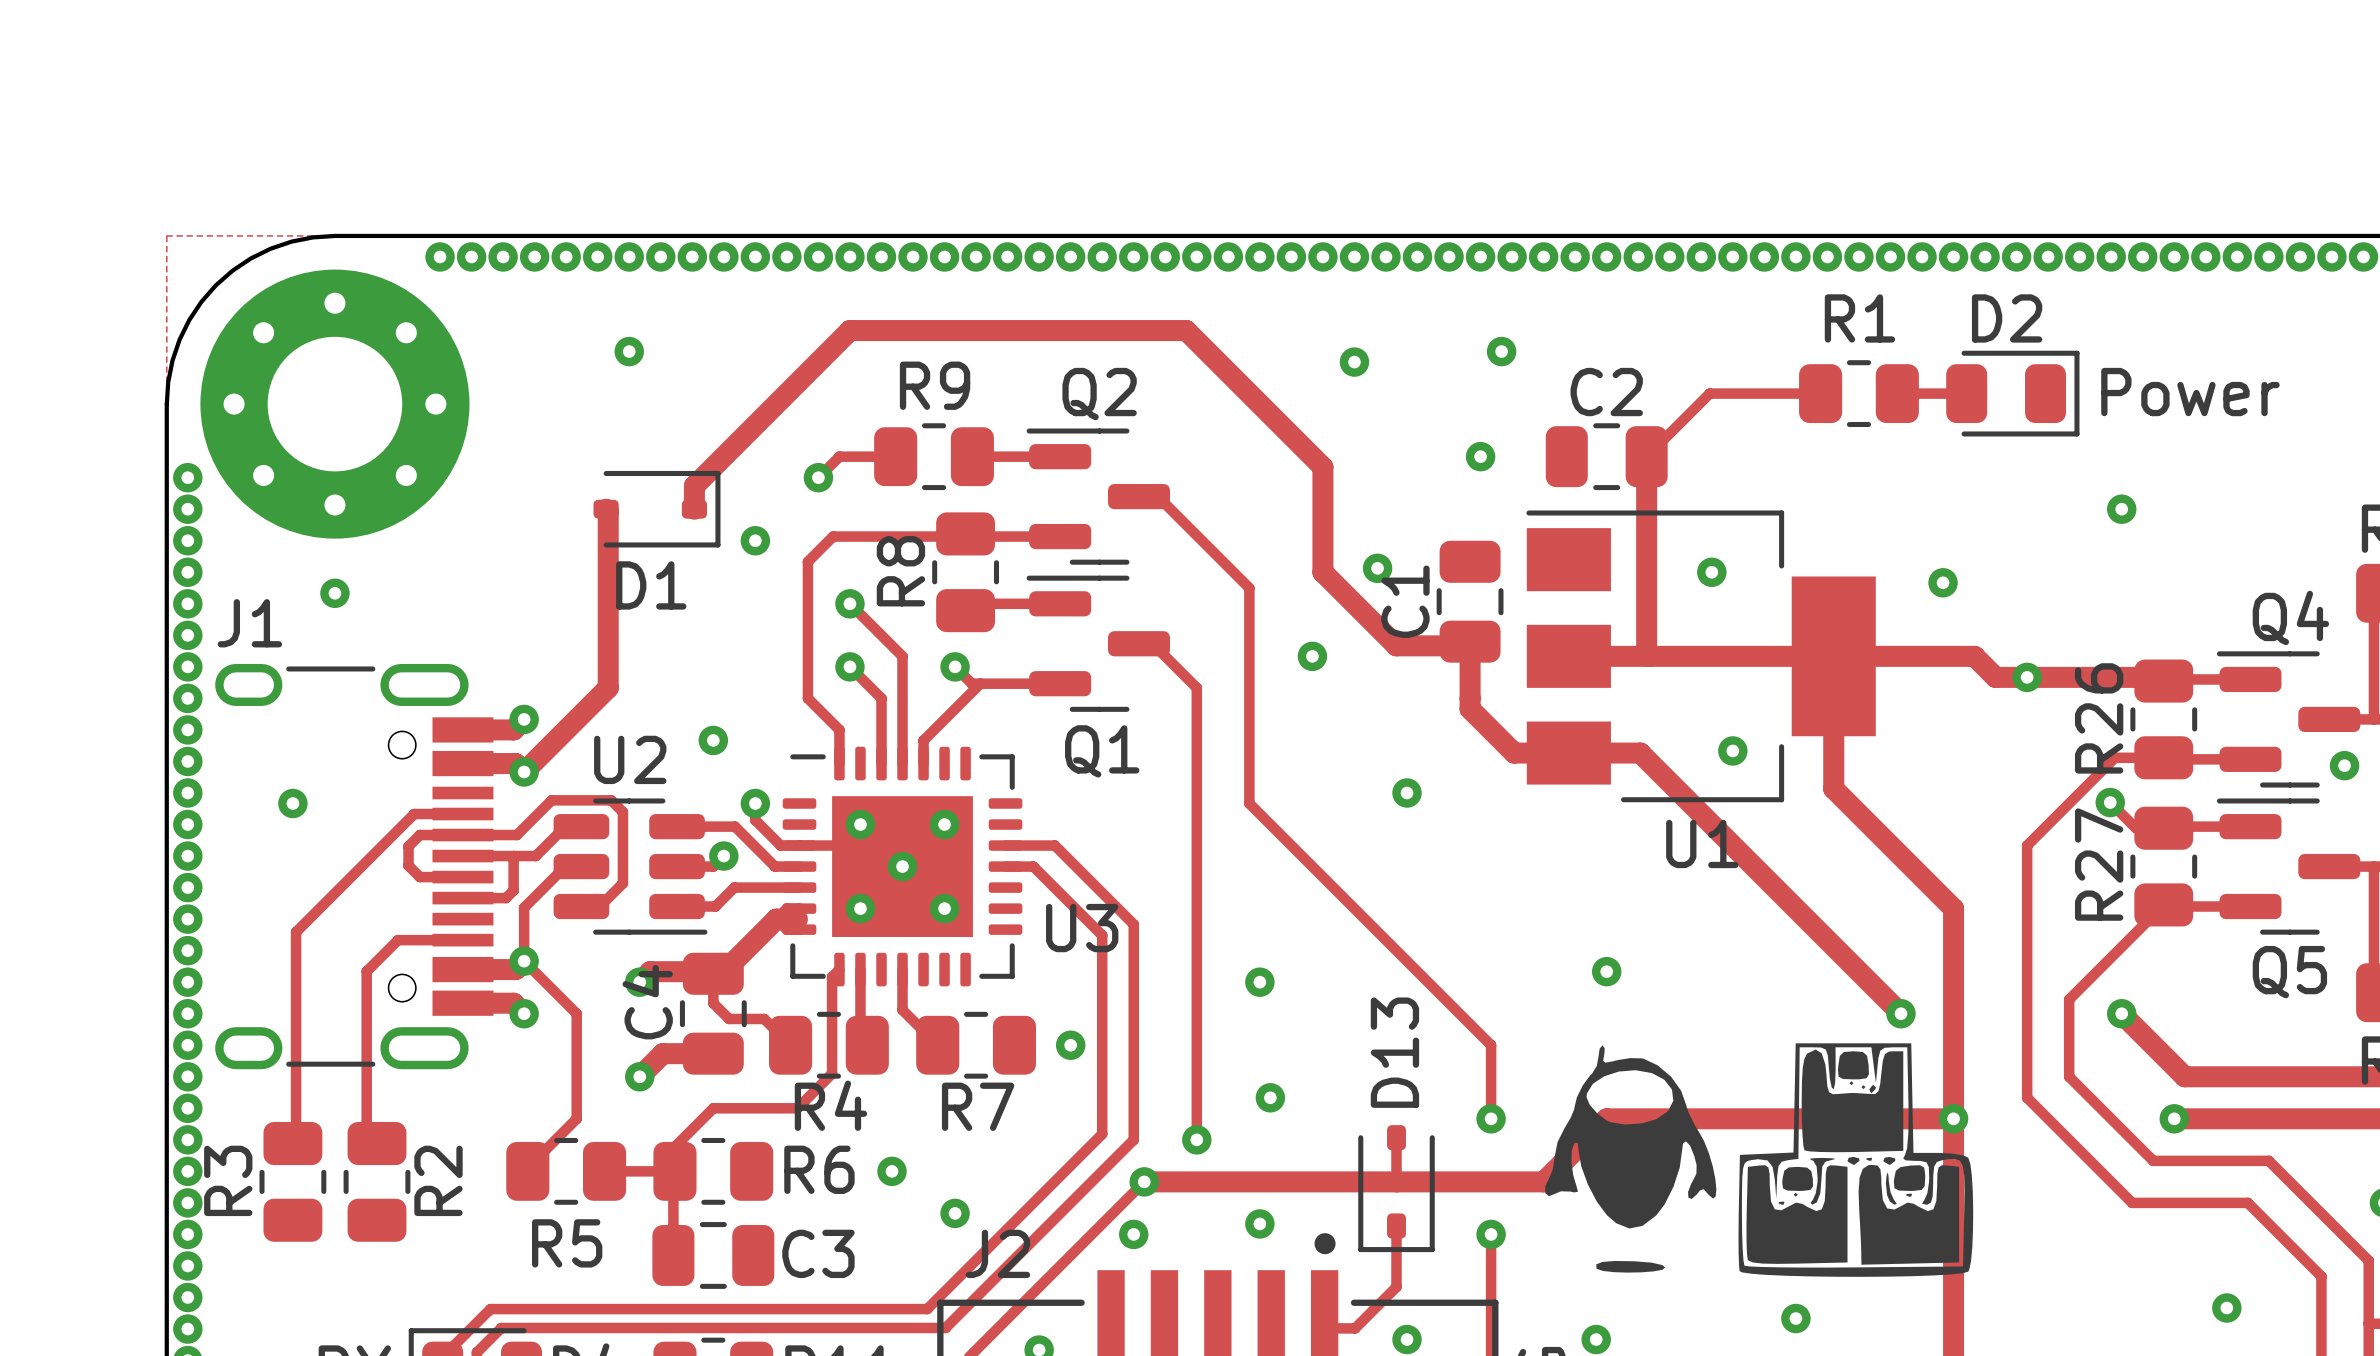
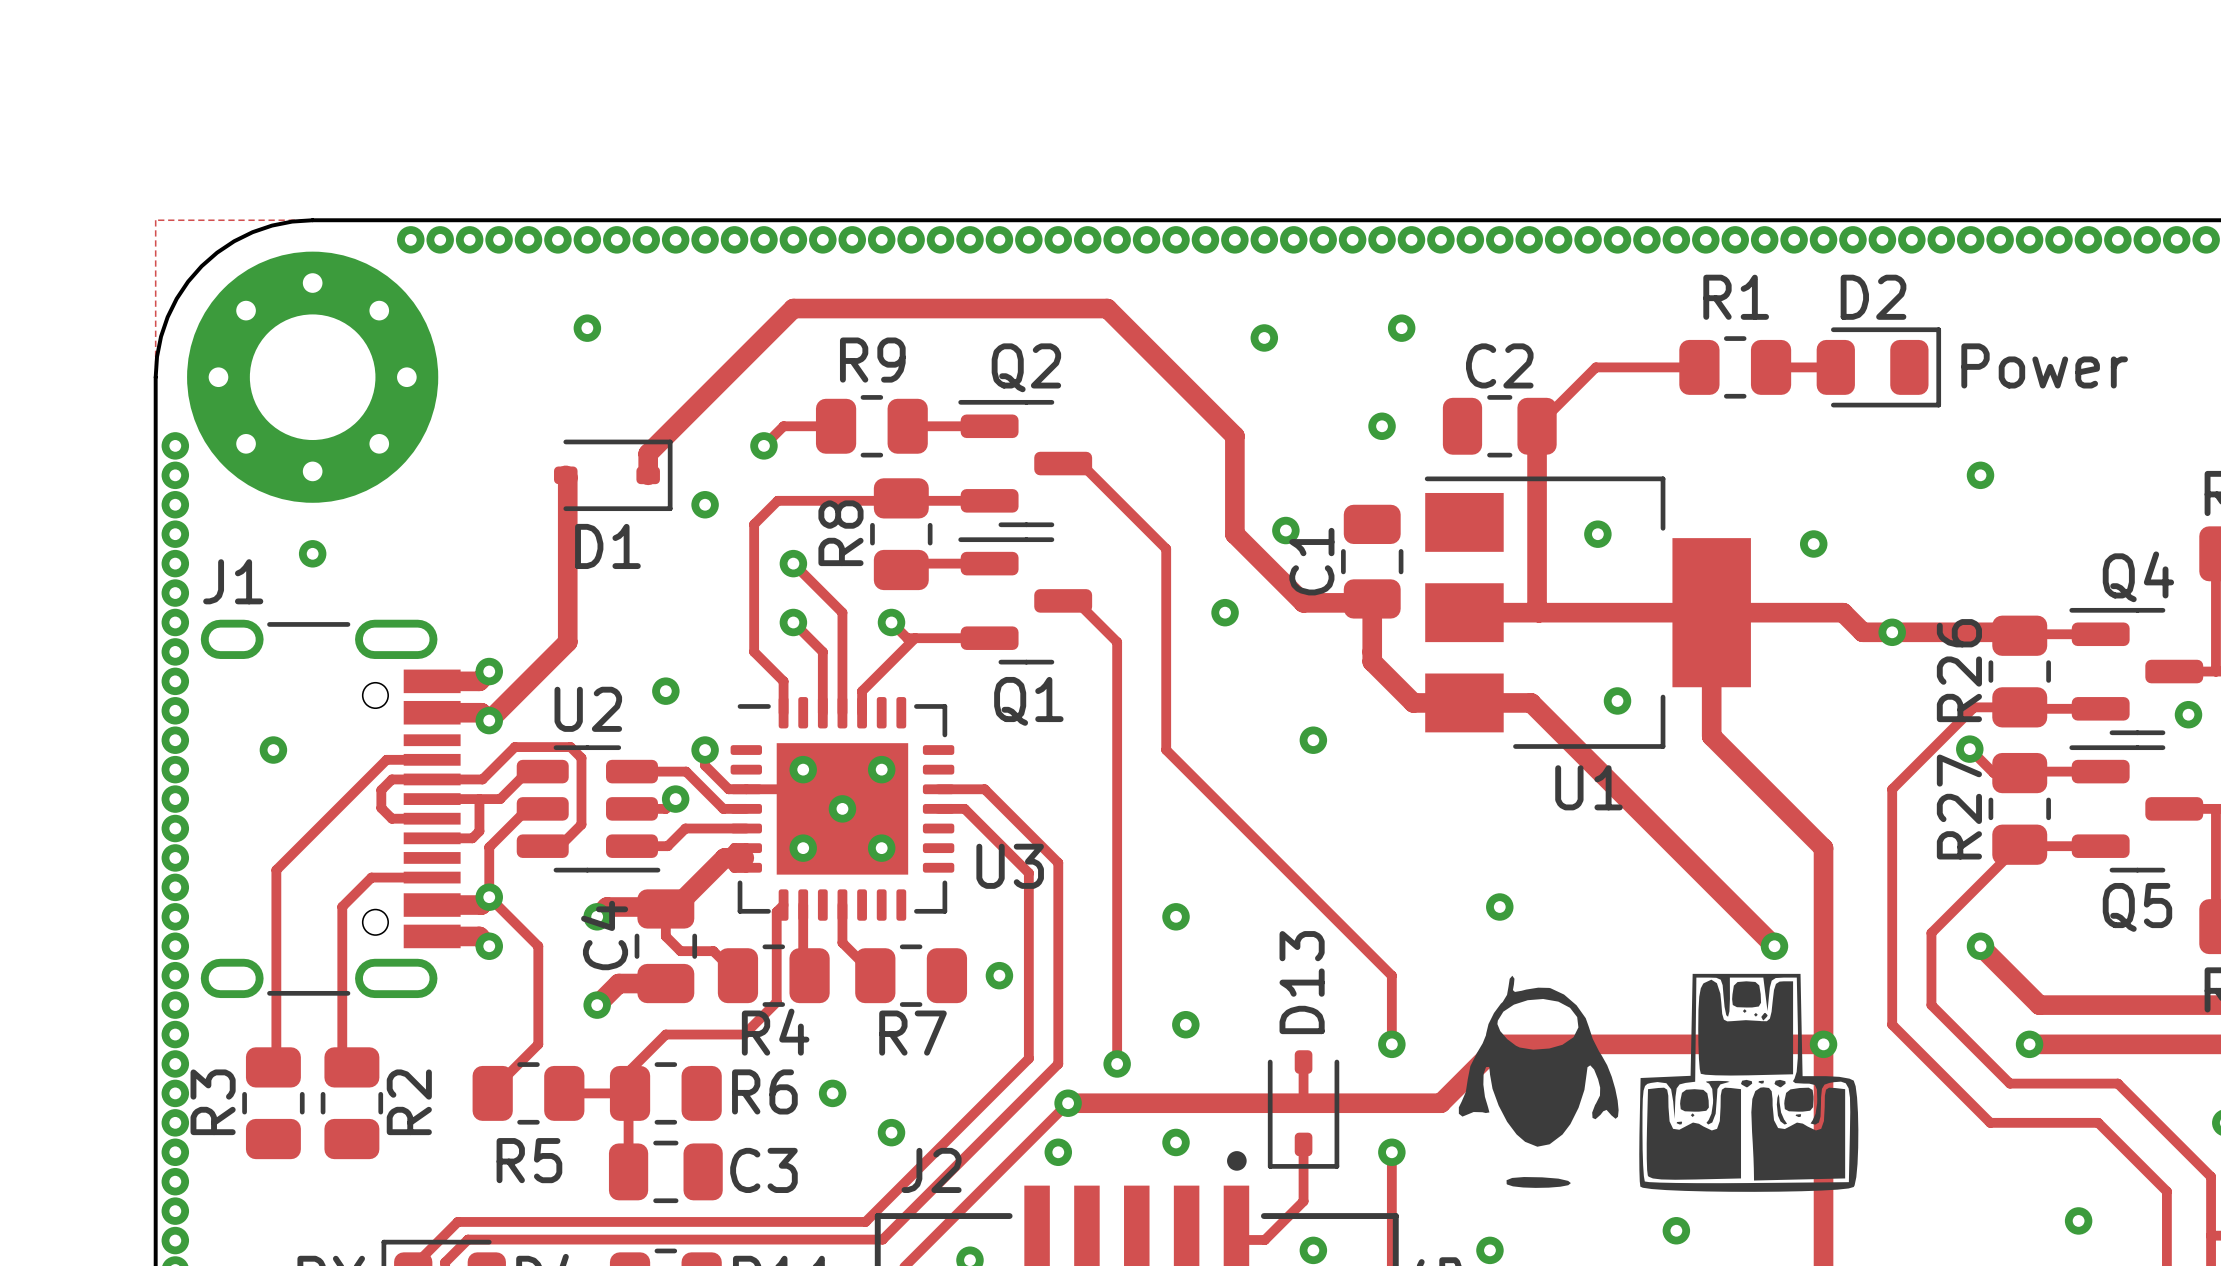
drawing position: (1759, 1160) -> (1658, 1082)

